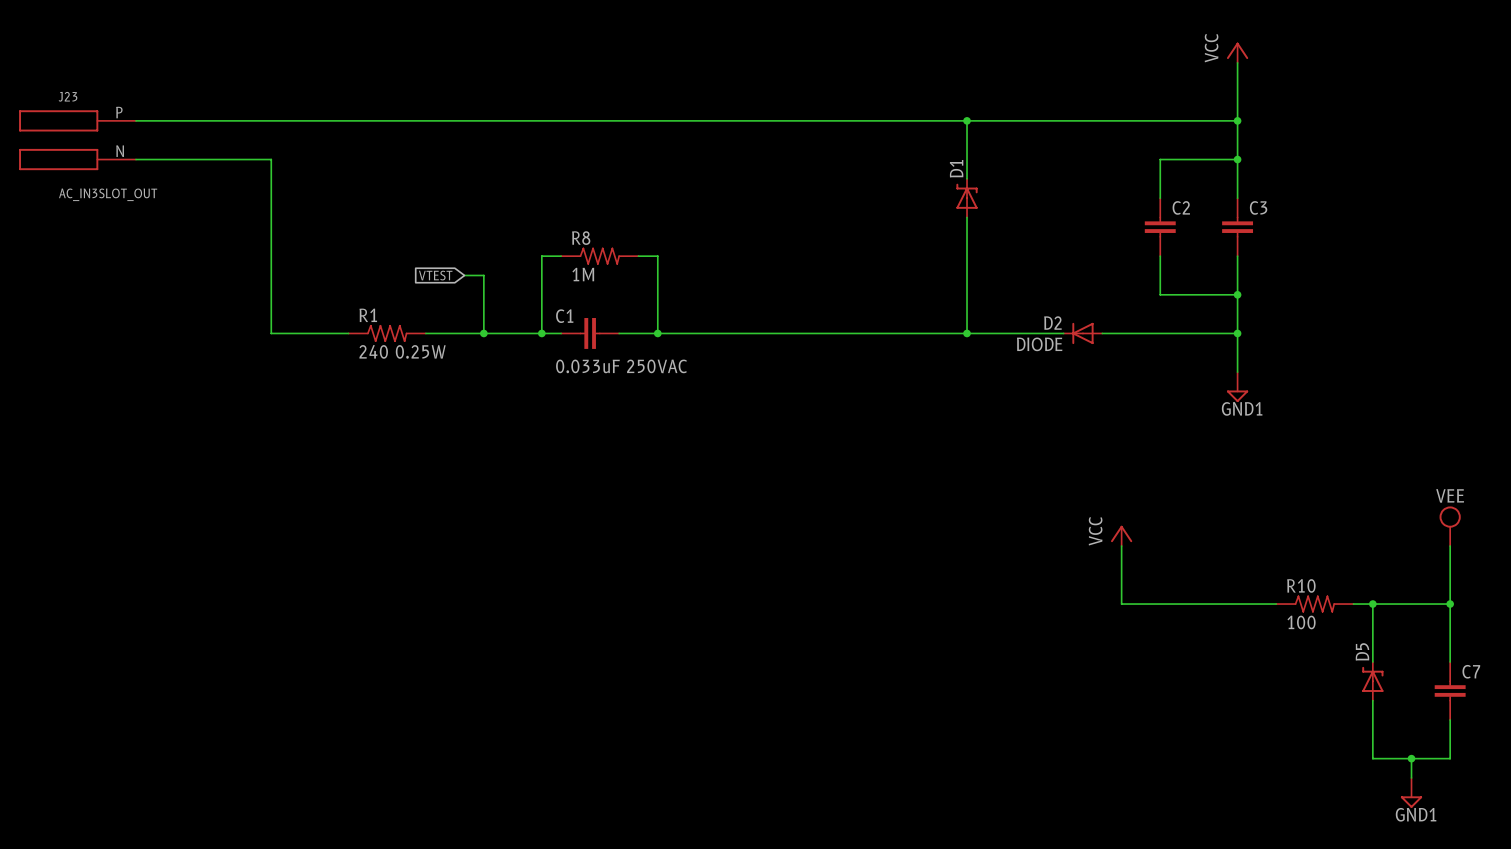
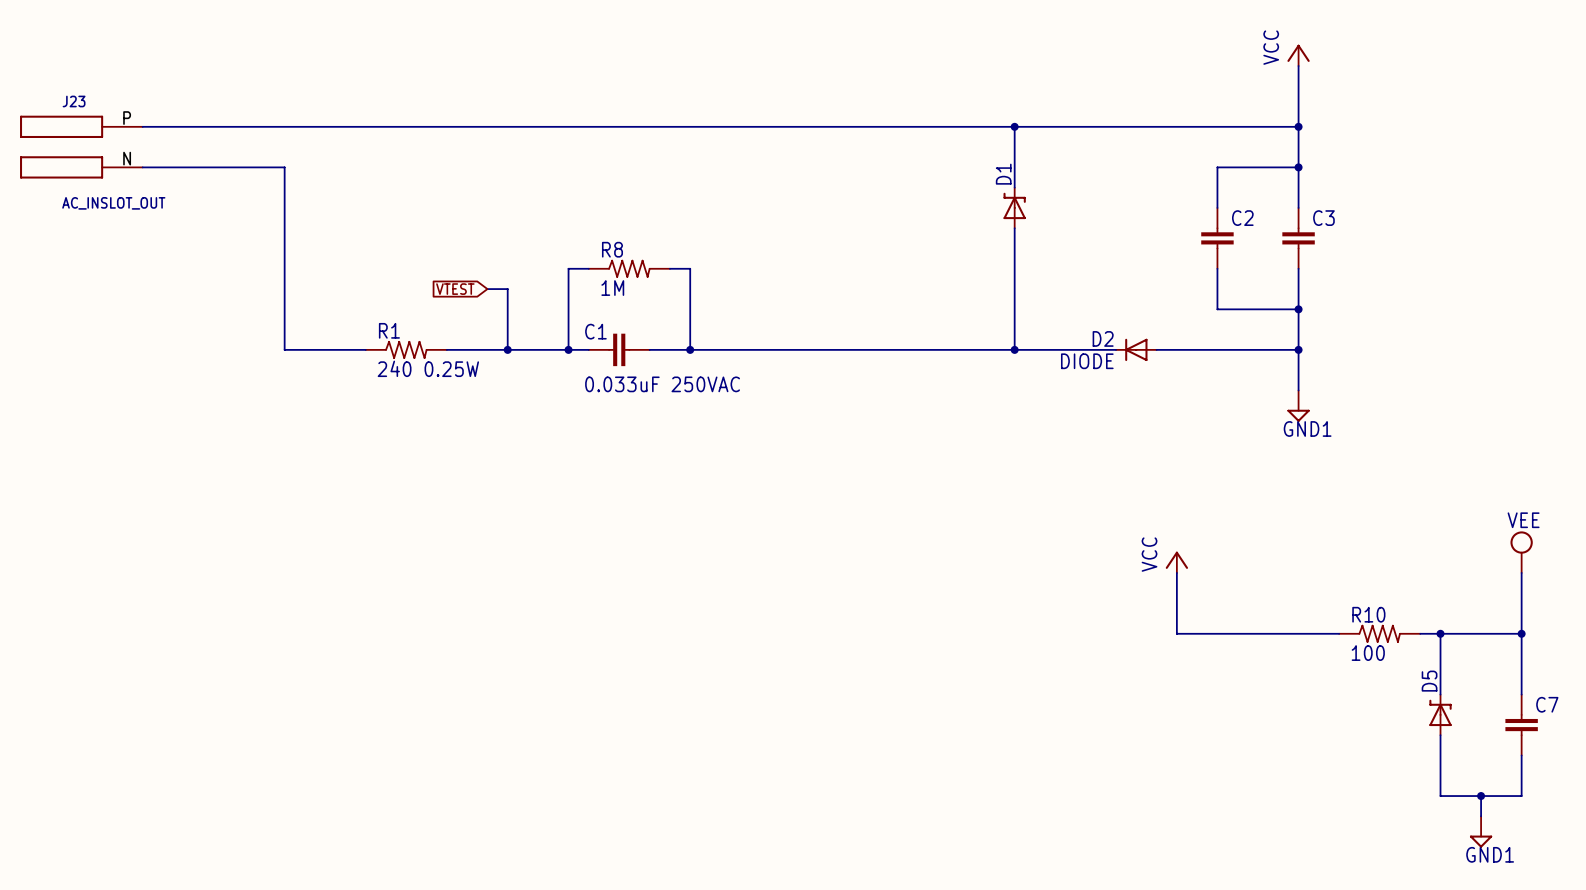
J23 value: AC_IN3SLOT_OUT (108, 194) -> AC_INSLOT_OUT (113, 203)

